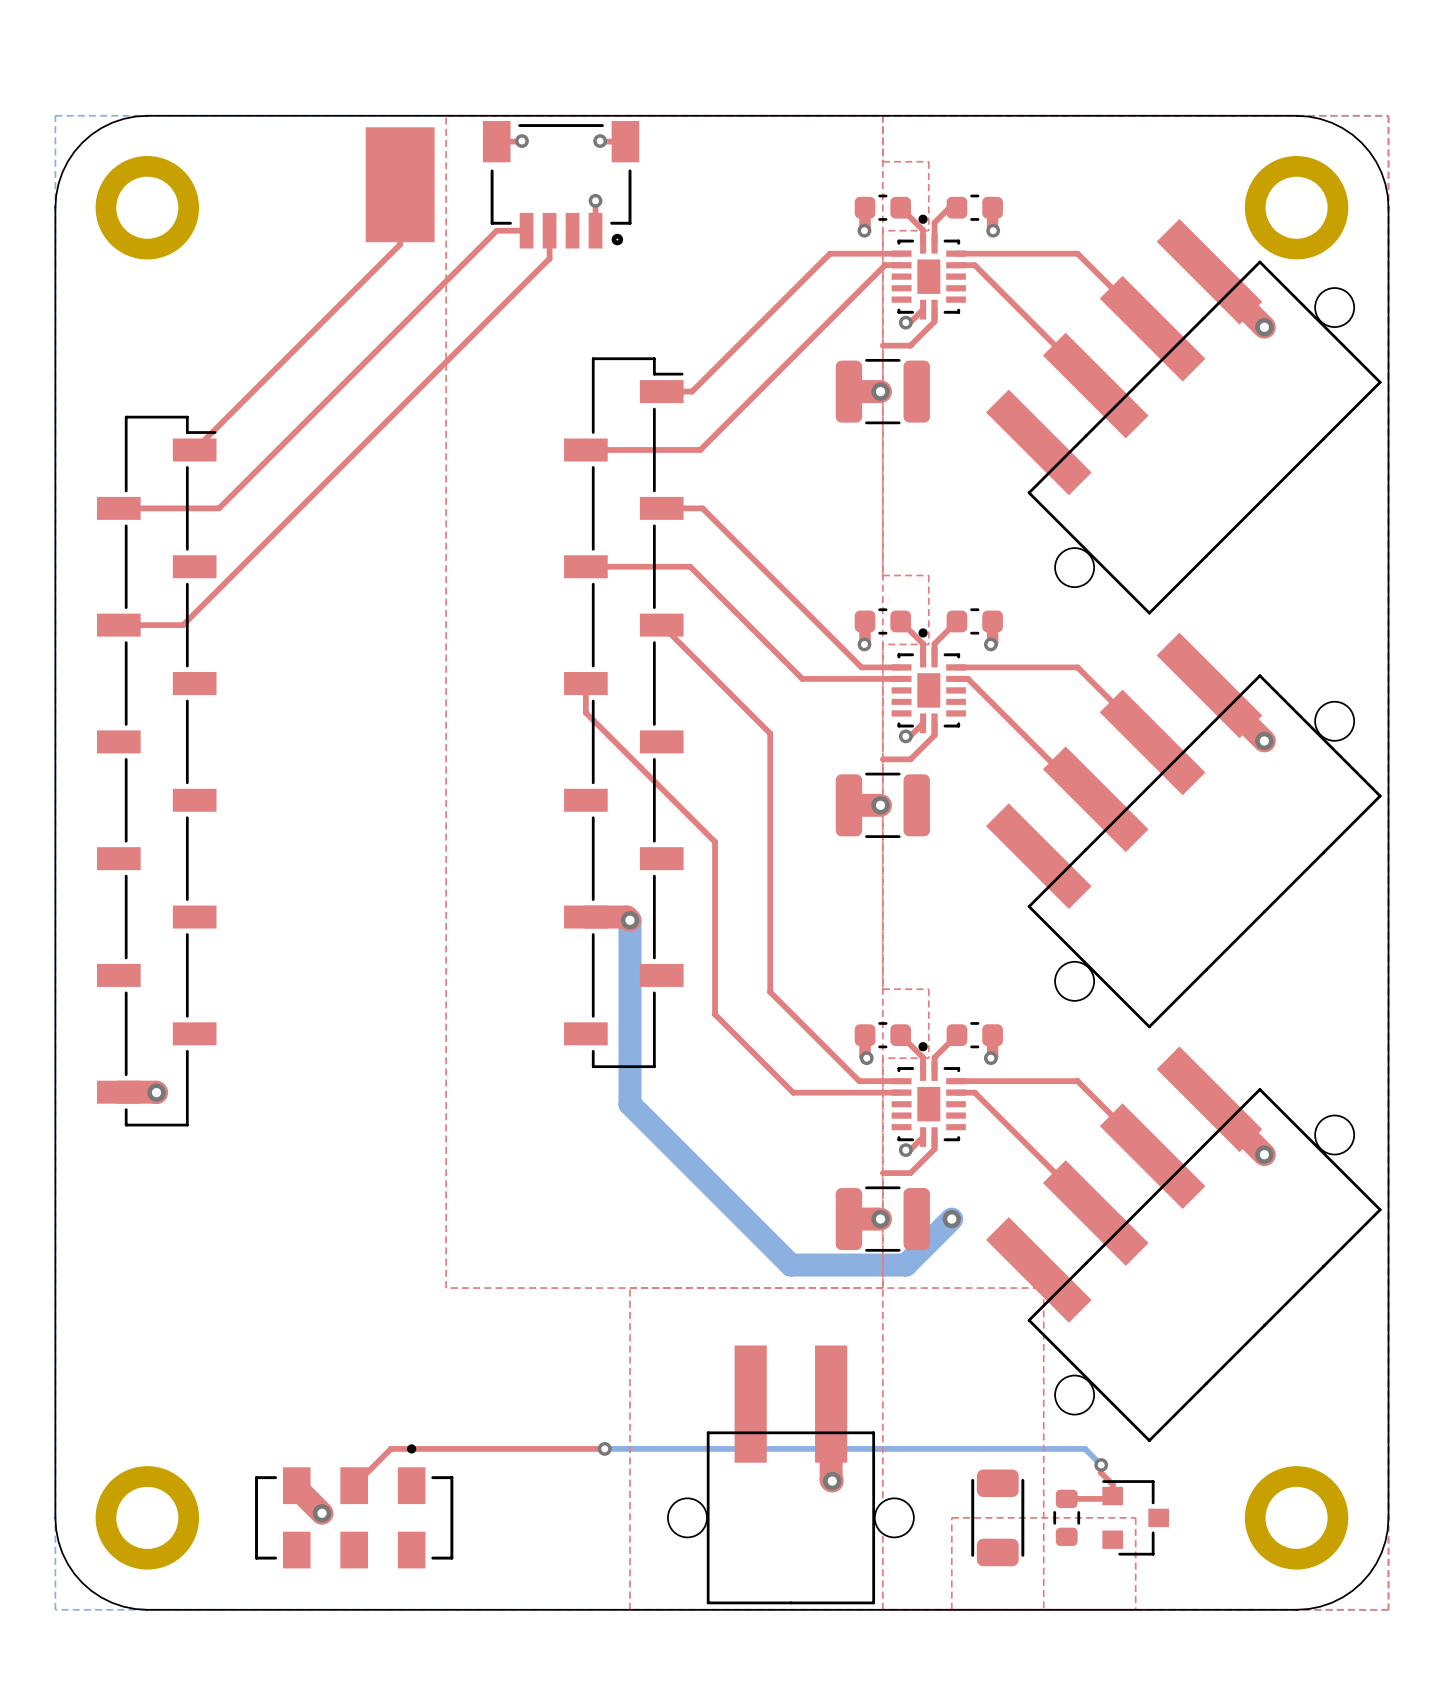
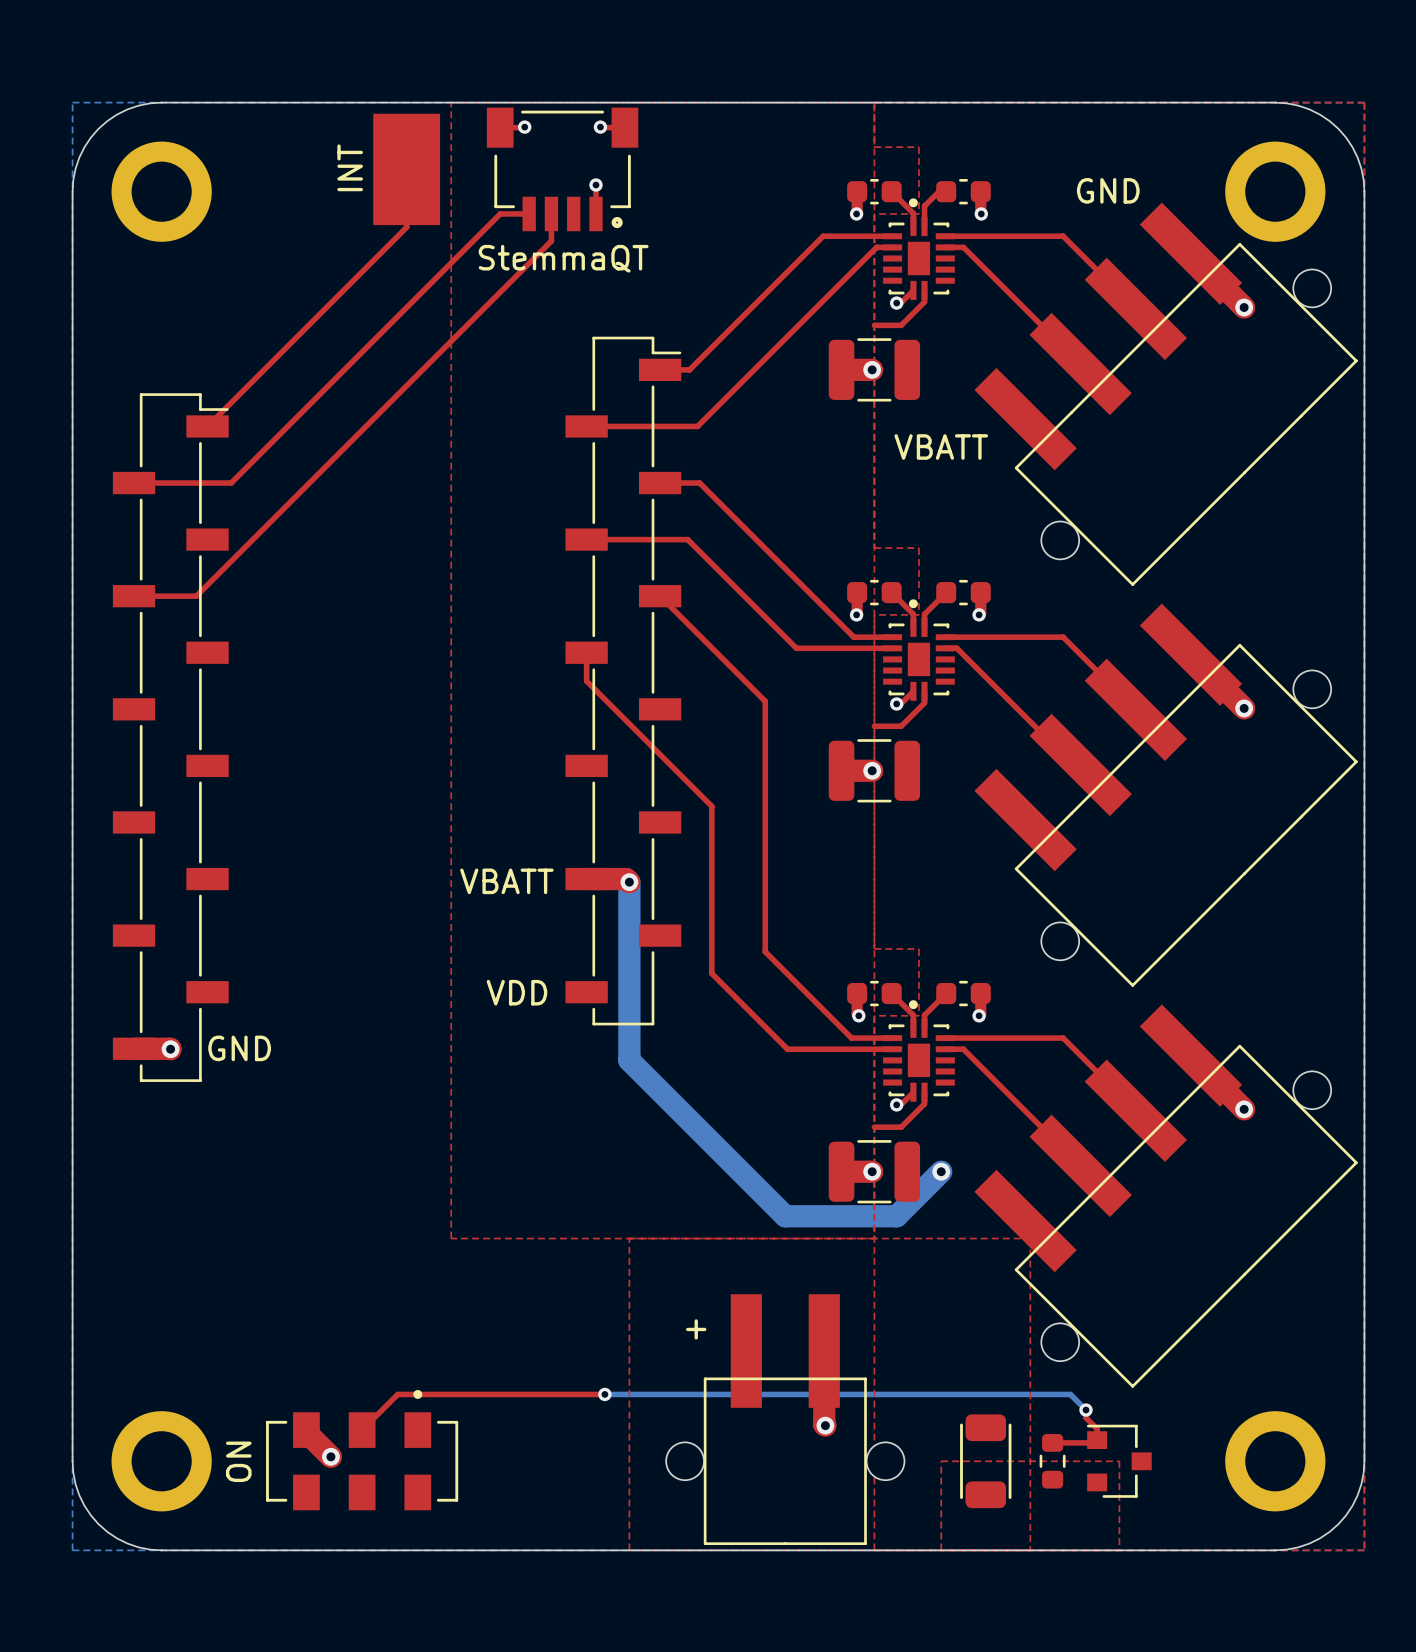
text: none -> INT (350, 167)
text: none -> GND (1108, 190)
text: none -> StemmaQT (563, 258)
text: none -> VBATT (941, 447)
text: none -> VBATT (506, 881)
text: none -> VDD (516, 992)
text: none -> GND (239, 1048)
text: none -> + (696, 1329)
text: none -> ON (238, 1461)

